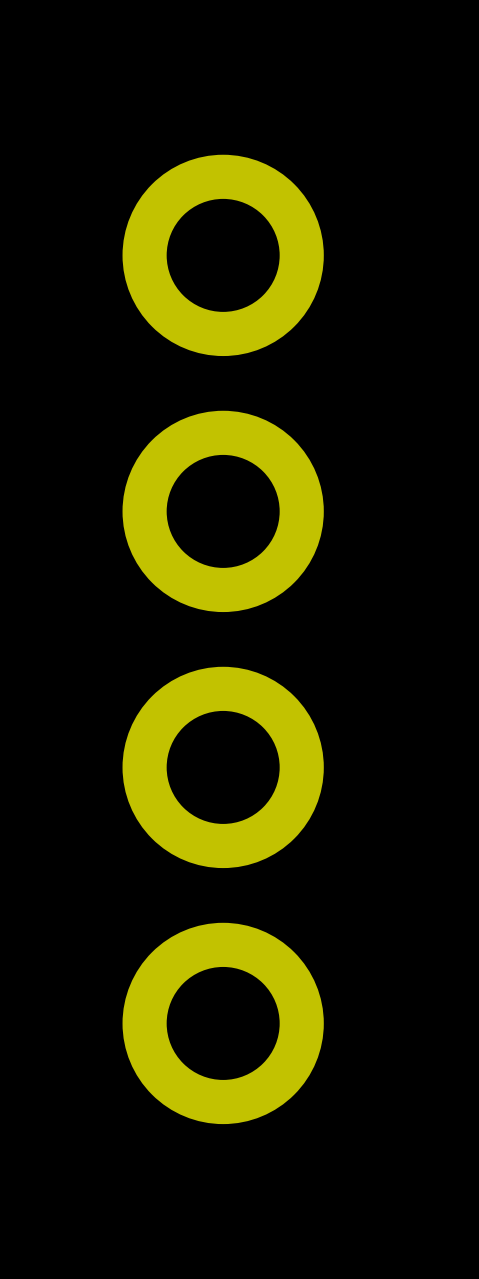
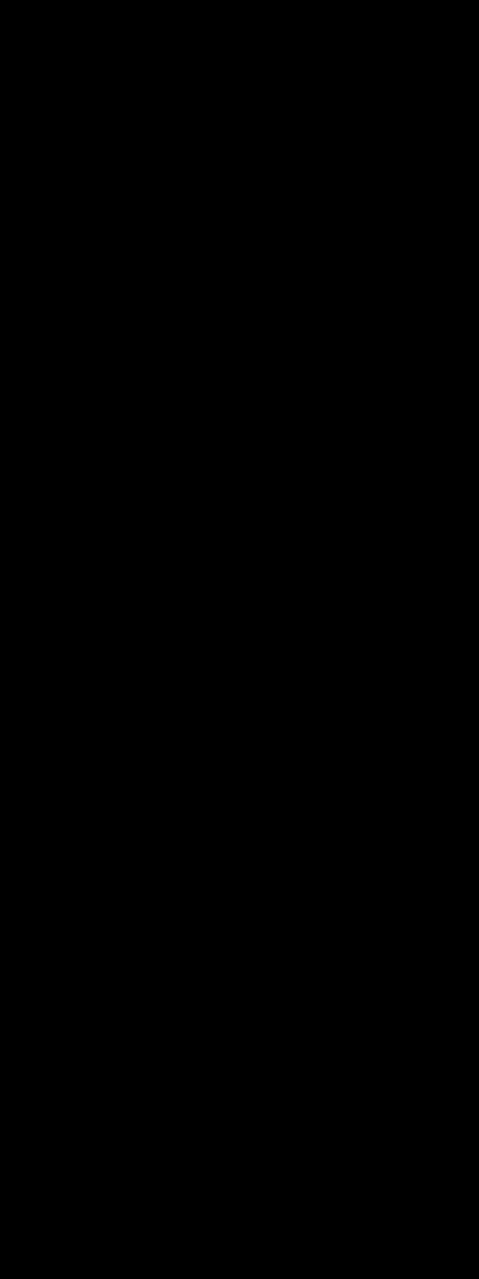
part: (223, 255) -> none
part: (223, 511) -> none
part: (223, 767) -> none
part: (223, 1023) -> none

